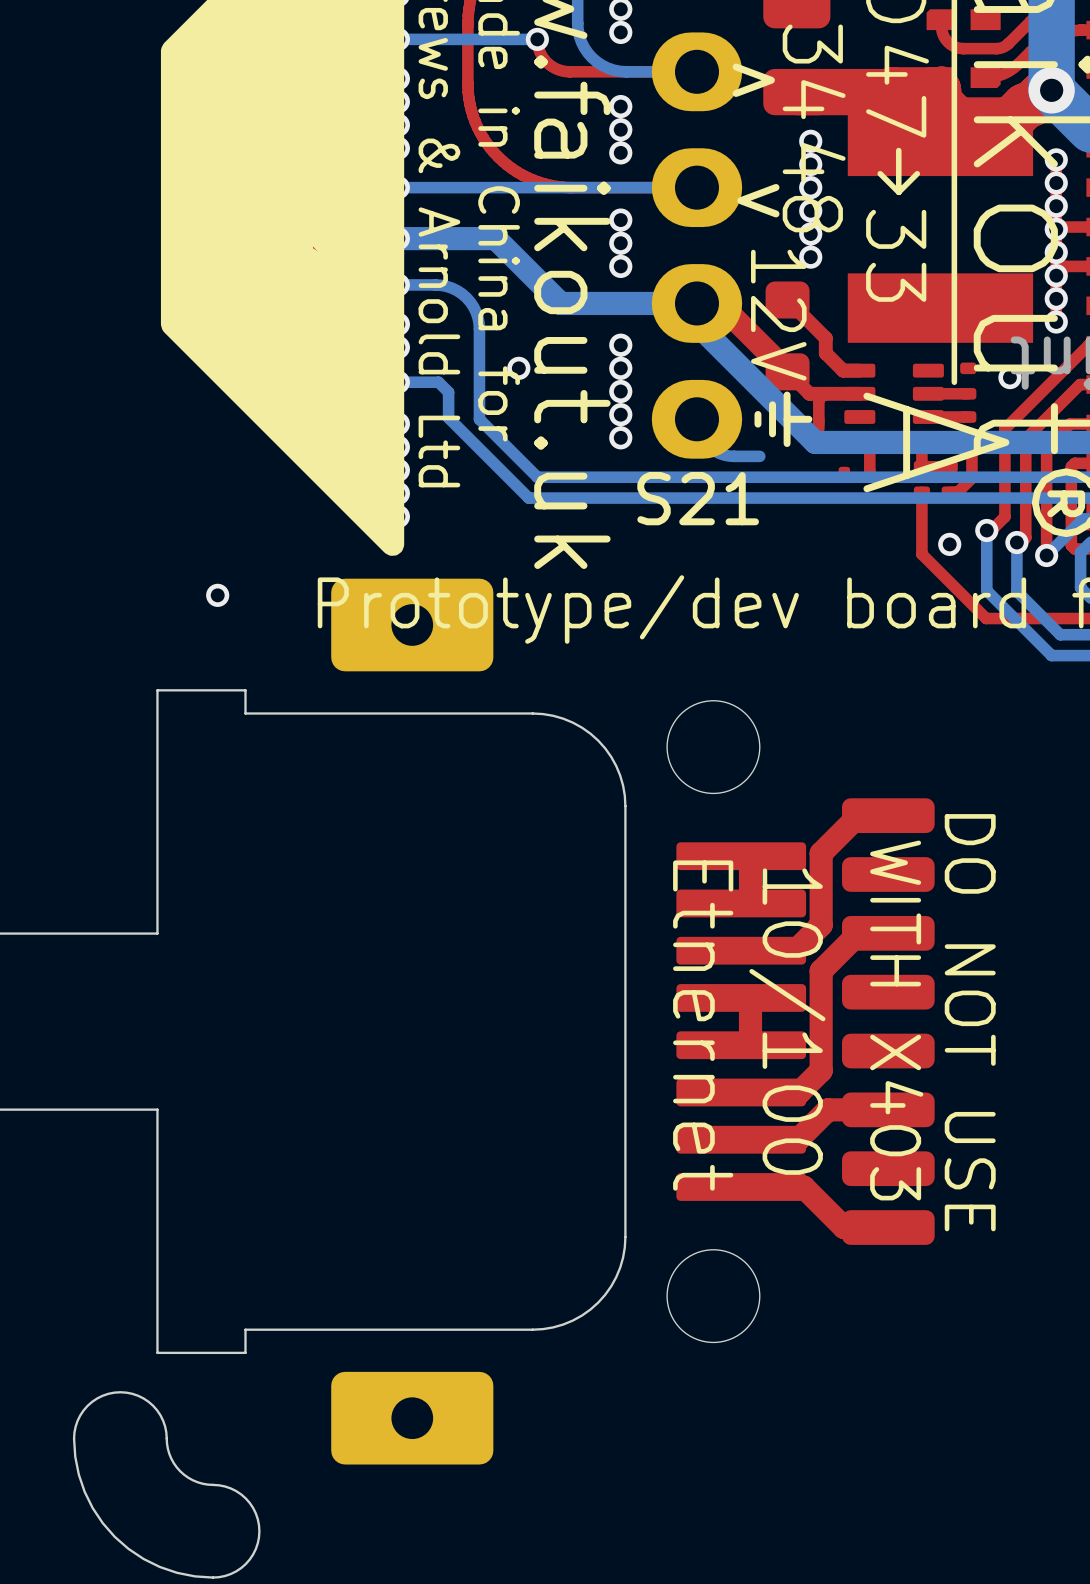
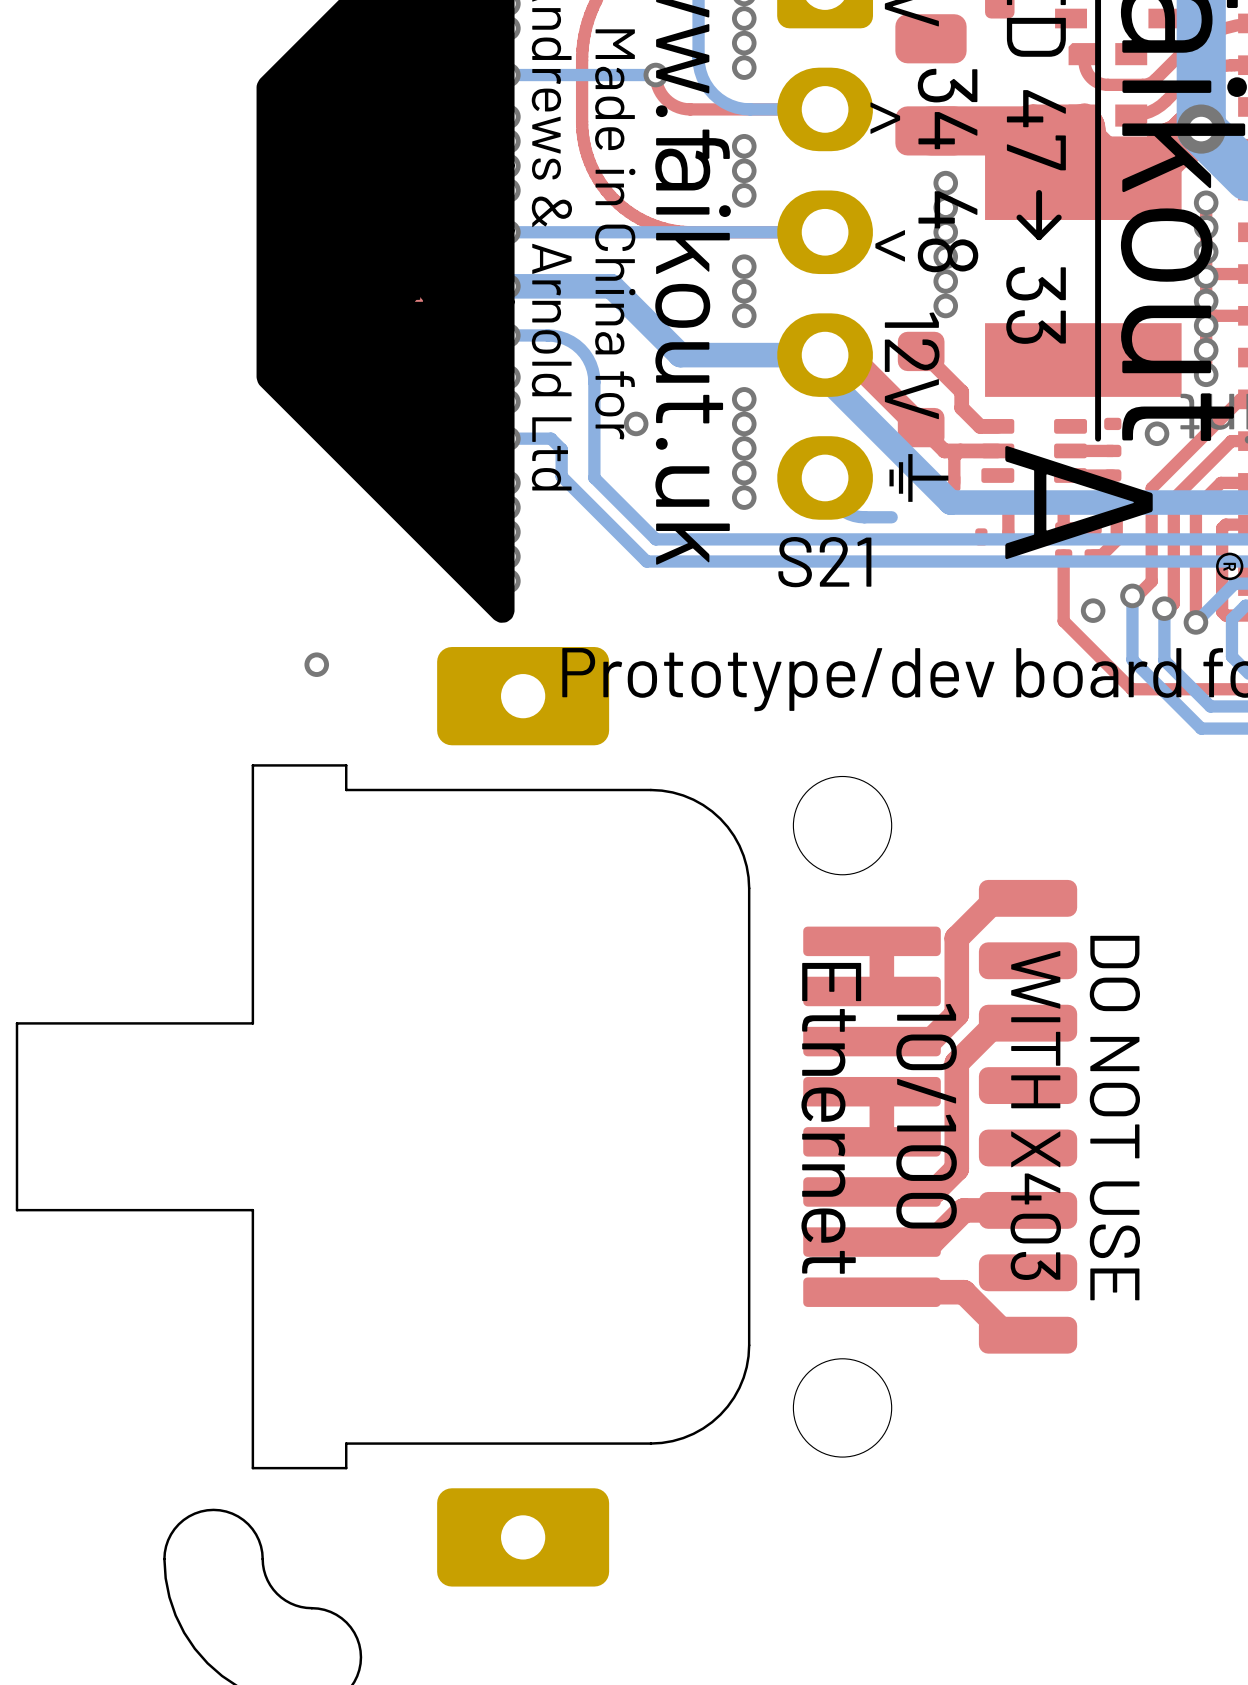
top track: (803, 1187) (844, 1227) (868, 1227) -> (938, 1292) (963, 1292) (1006, 1335)

